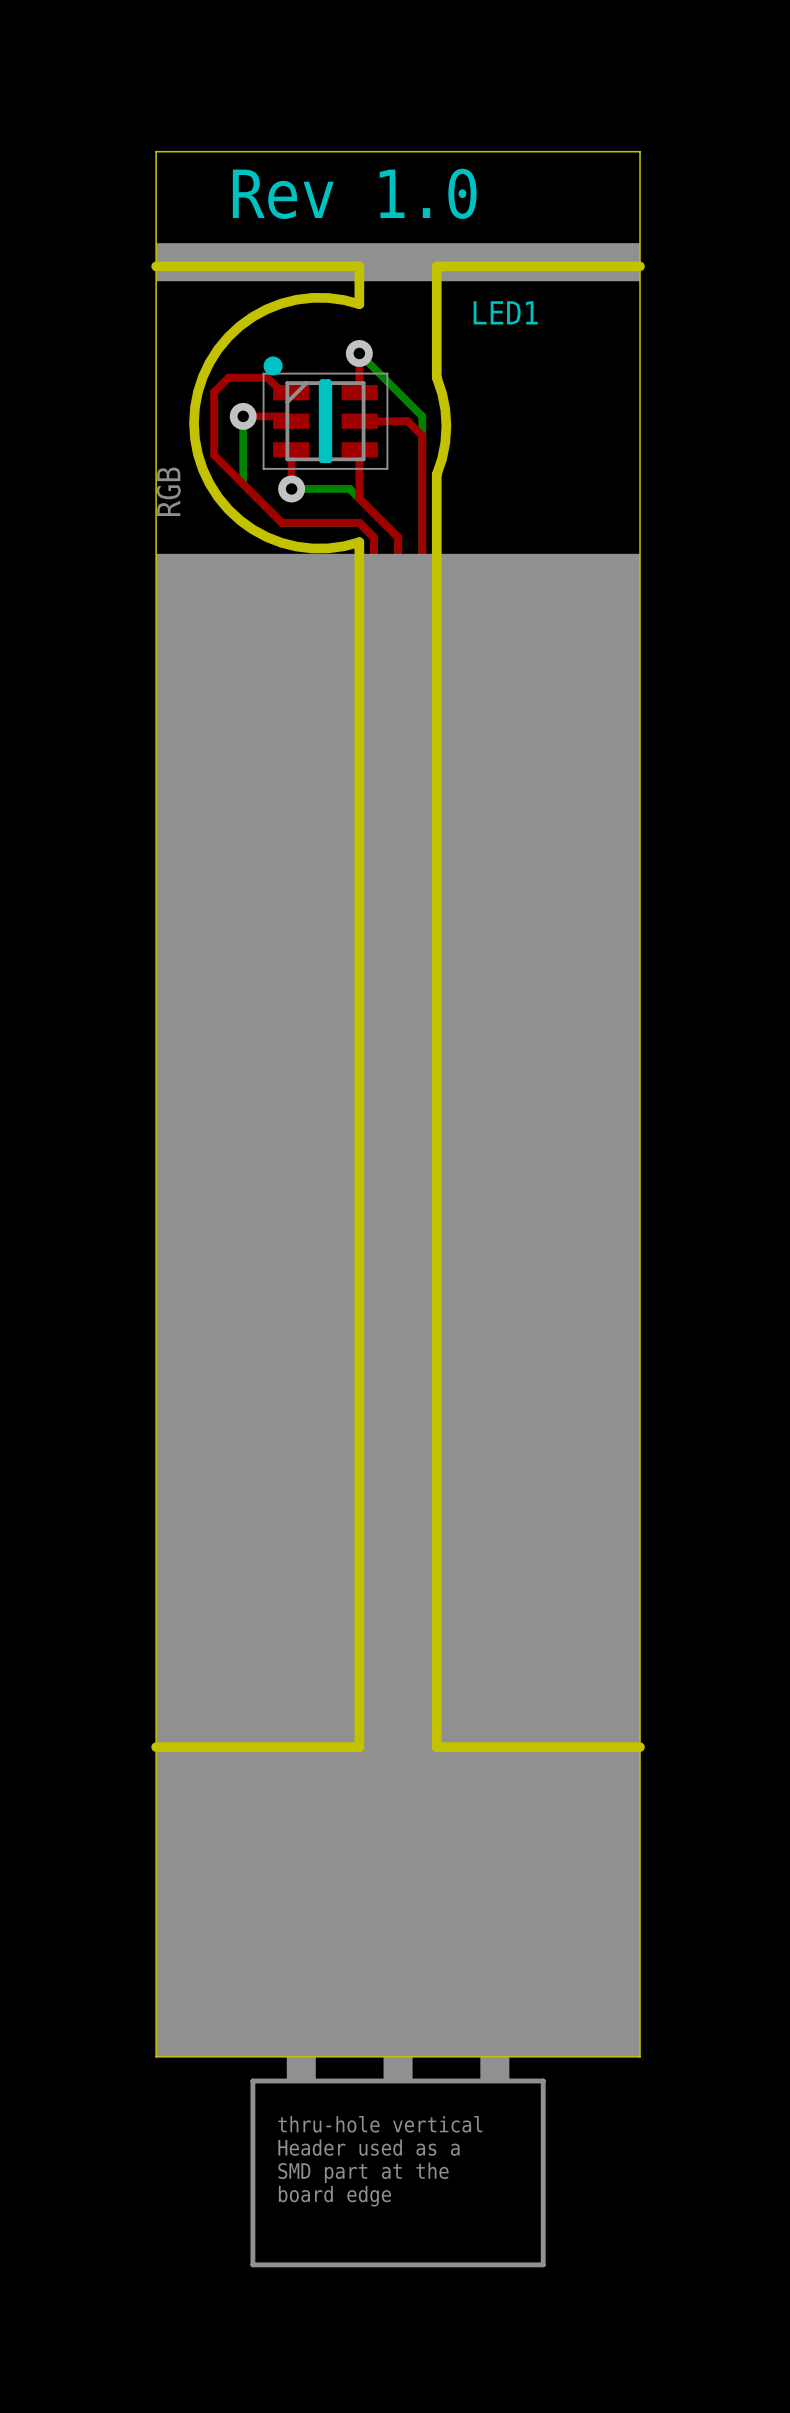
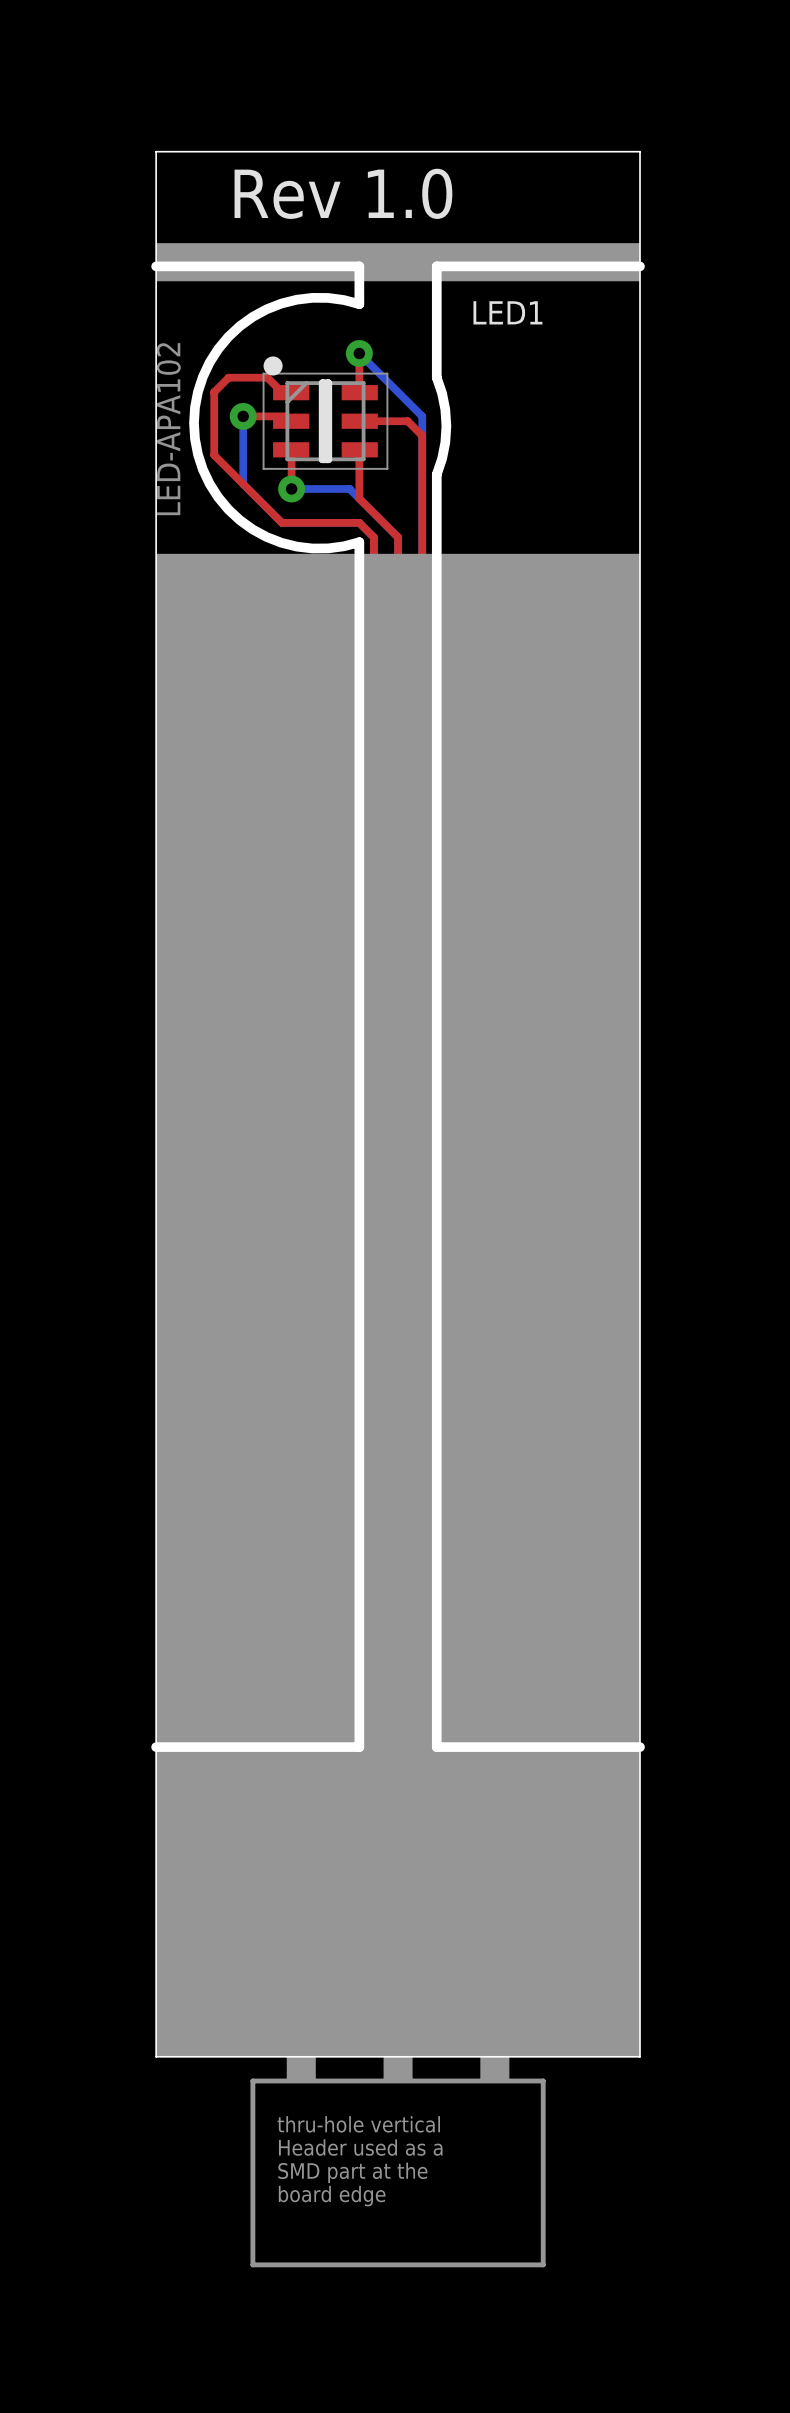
LED1 value: RGB (168, 491) -> LED-APA102 (168, 429)

